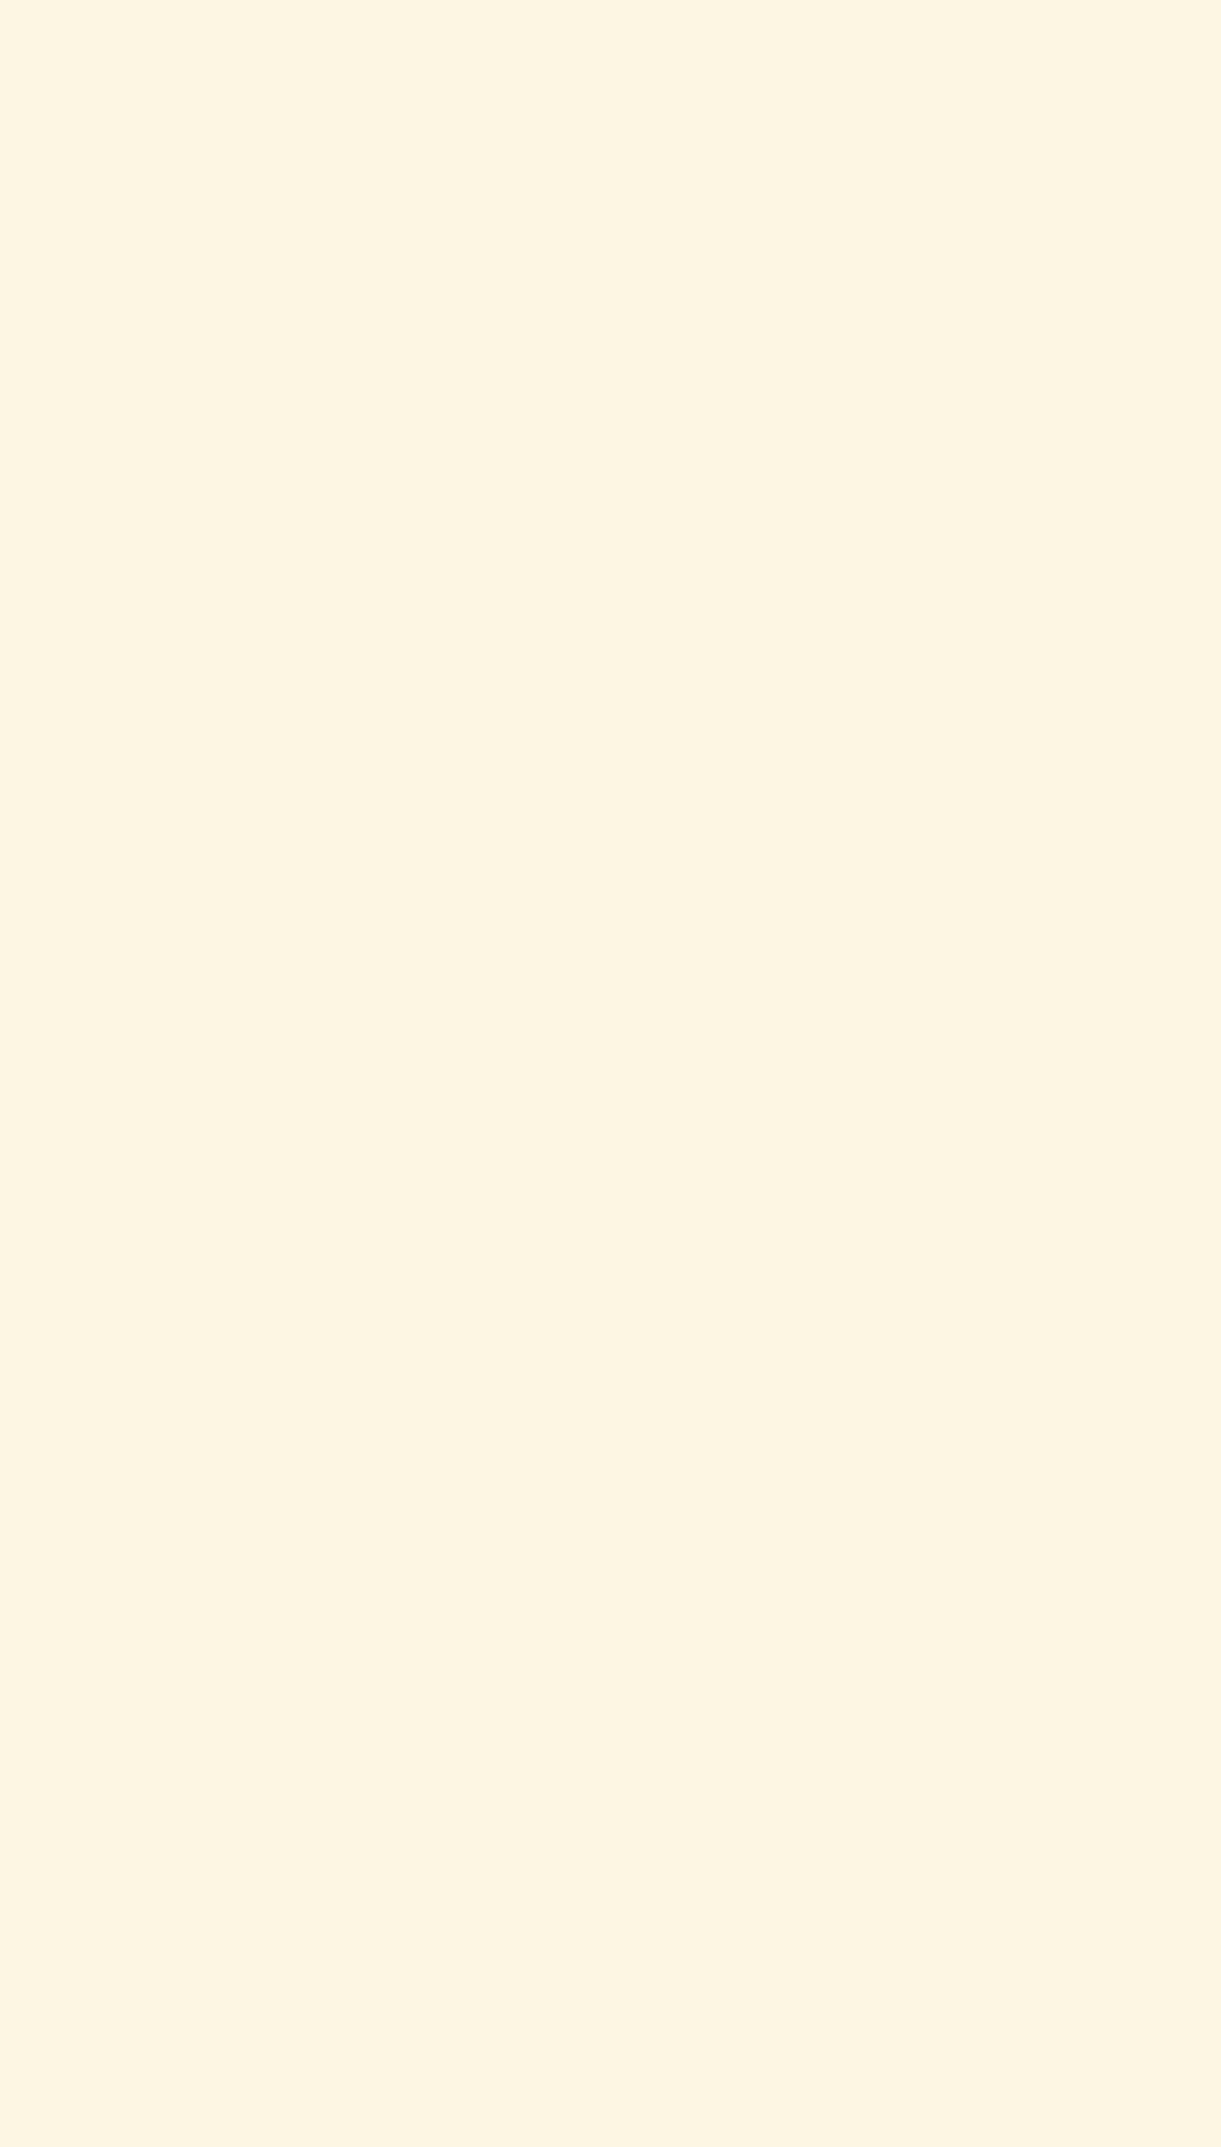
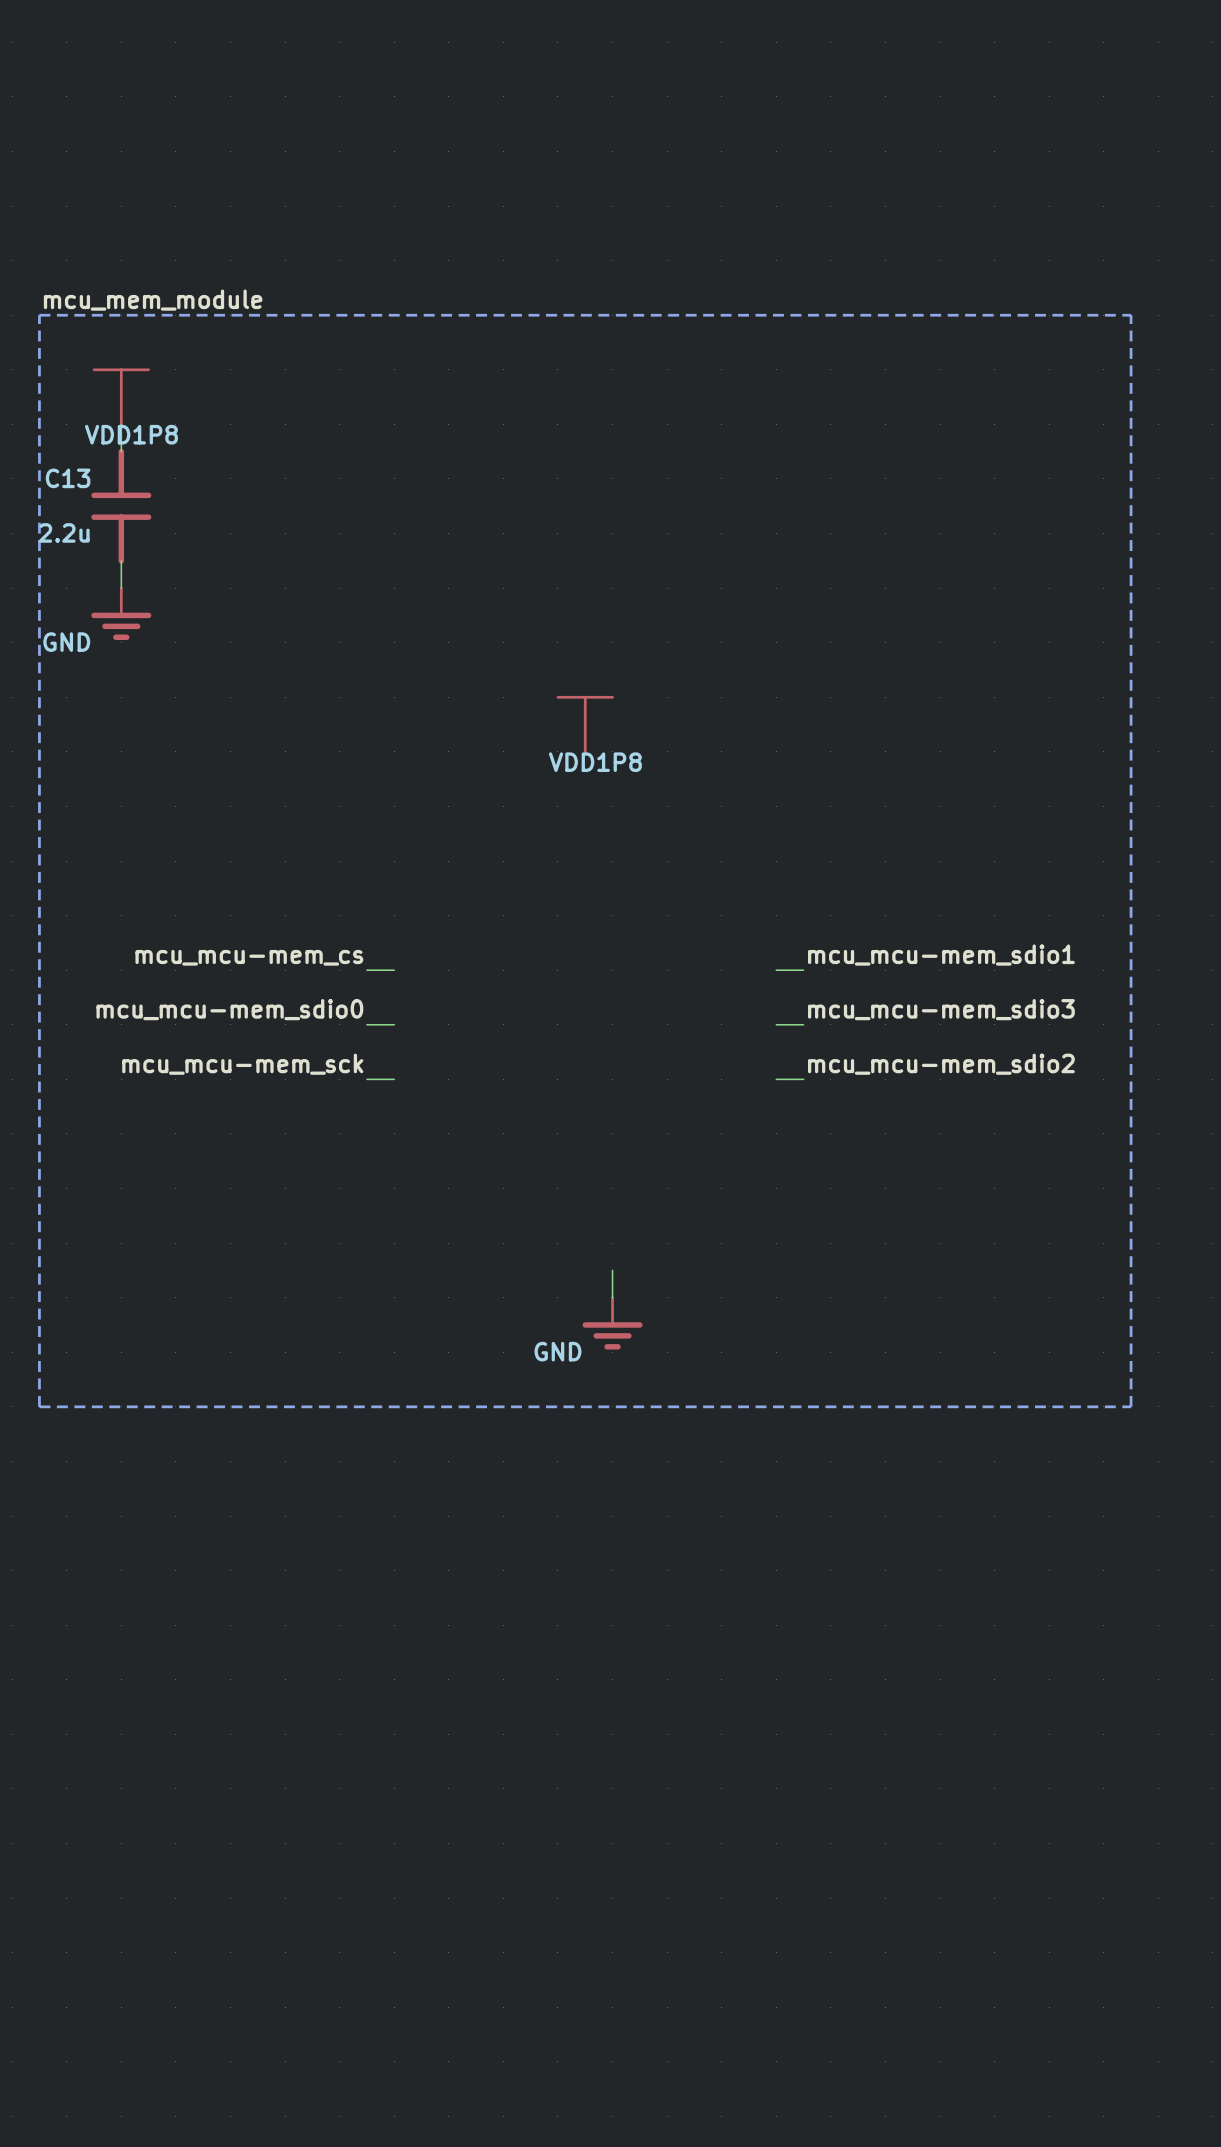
label: none -> mcu_mem_module (153, 300)
line: none -> (39, 315) (1131, 315) (1131, 1406) (39, 1406) (39, 315)
power symbol: none -> VDD1P8 (121, 397)
wire: none -> (121, 424) (121, 451)
C13: none -> 2.2u (121, 506)
wire: none -> (121, 560) (121, 588)
power symbol: none -> GND (121, 613)
power symbol: none -> VDD1P8 (585, 724)
label: none -> mcu_mcu-mem_sdio1 (941, 955)
label: none -> mcu_mcu-mem_cs (249, 957)
wire: none -> (366, 970) (394, 970)
wire: none -> (776, 970) (803, 970)
label: none -> mcu_mcu-mem_sdio0 (229, 1009)
label: none -> mcu_mcu-mem_sdio3 (941, 1009)
wire: none -> (366, 1024) (394, 1024)
wire: none -> (776, 1024) (803, 1024)
label: none -> mcu_mcu-mem_sck (242, 1064)
label: none -> mcu_mcu-mem_sdio2 (941, 1064)
wire: none -> (366, 1079) (394, 1079)
wire: none -> (776, 1079) (803, 1079)
wire: none -> (612, 1270) (612, 1297)
power symbol: none -> GND (612, 1322)

